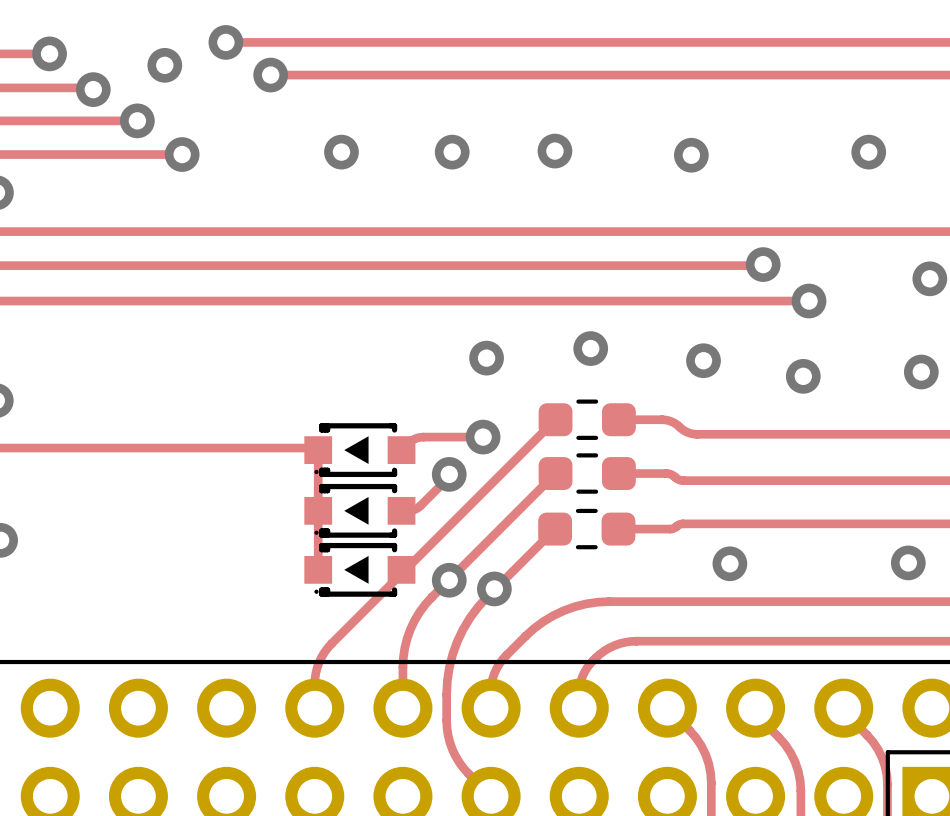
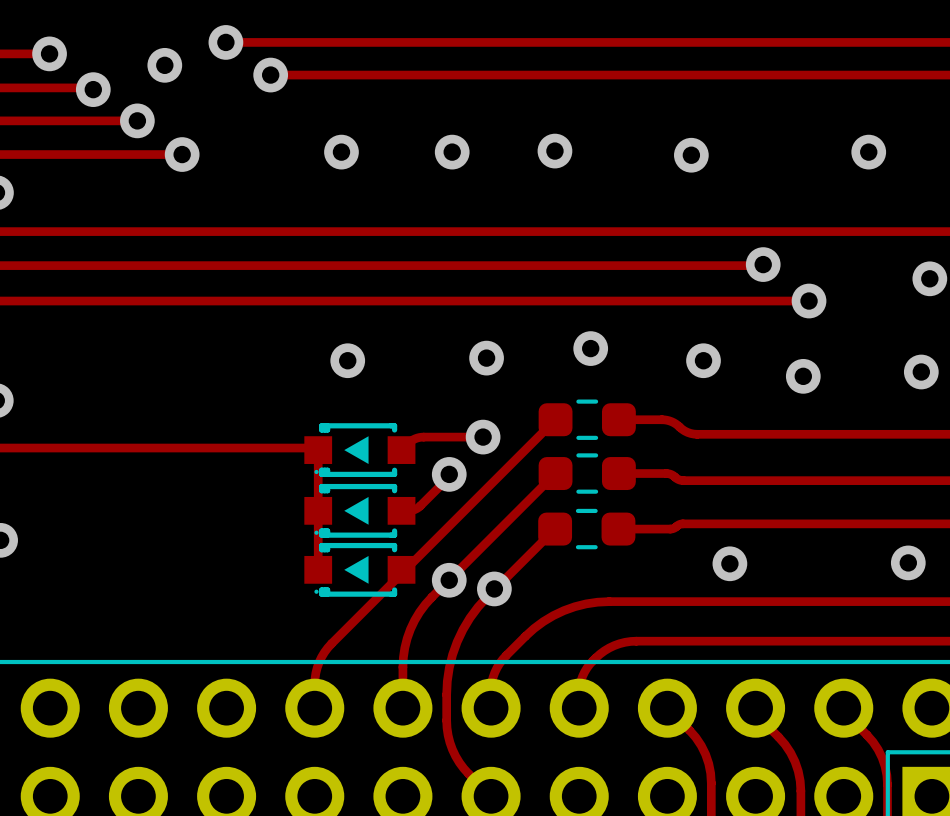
via: none -> (347, 360)

